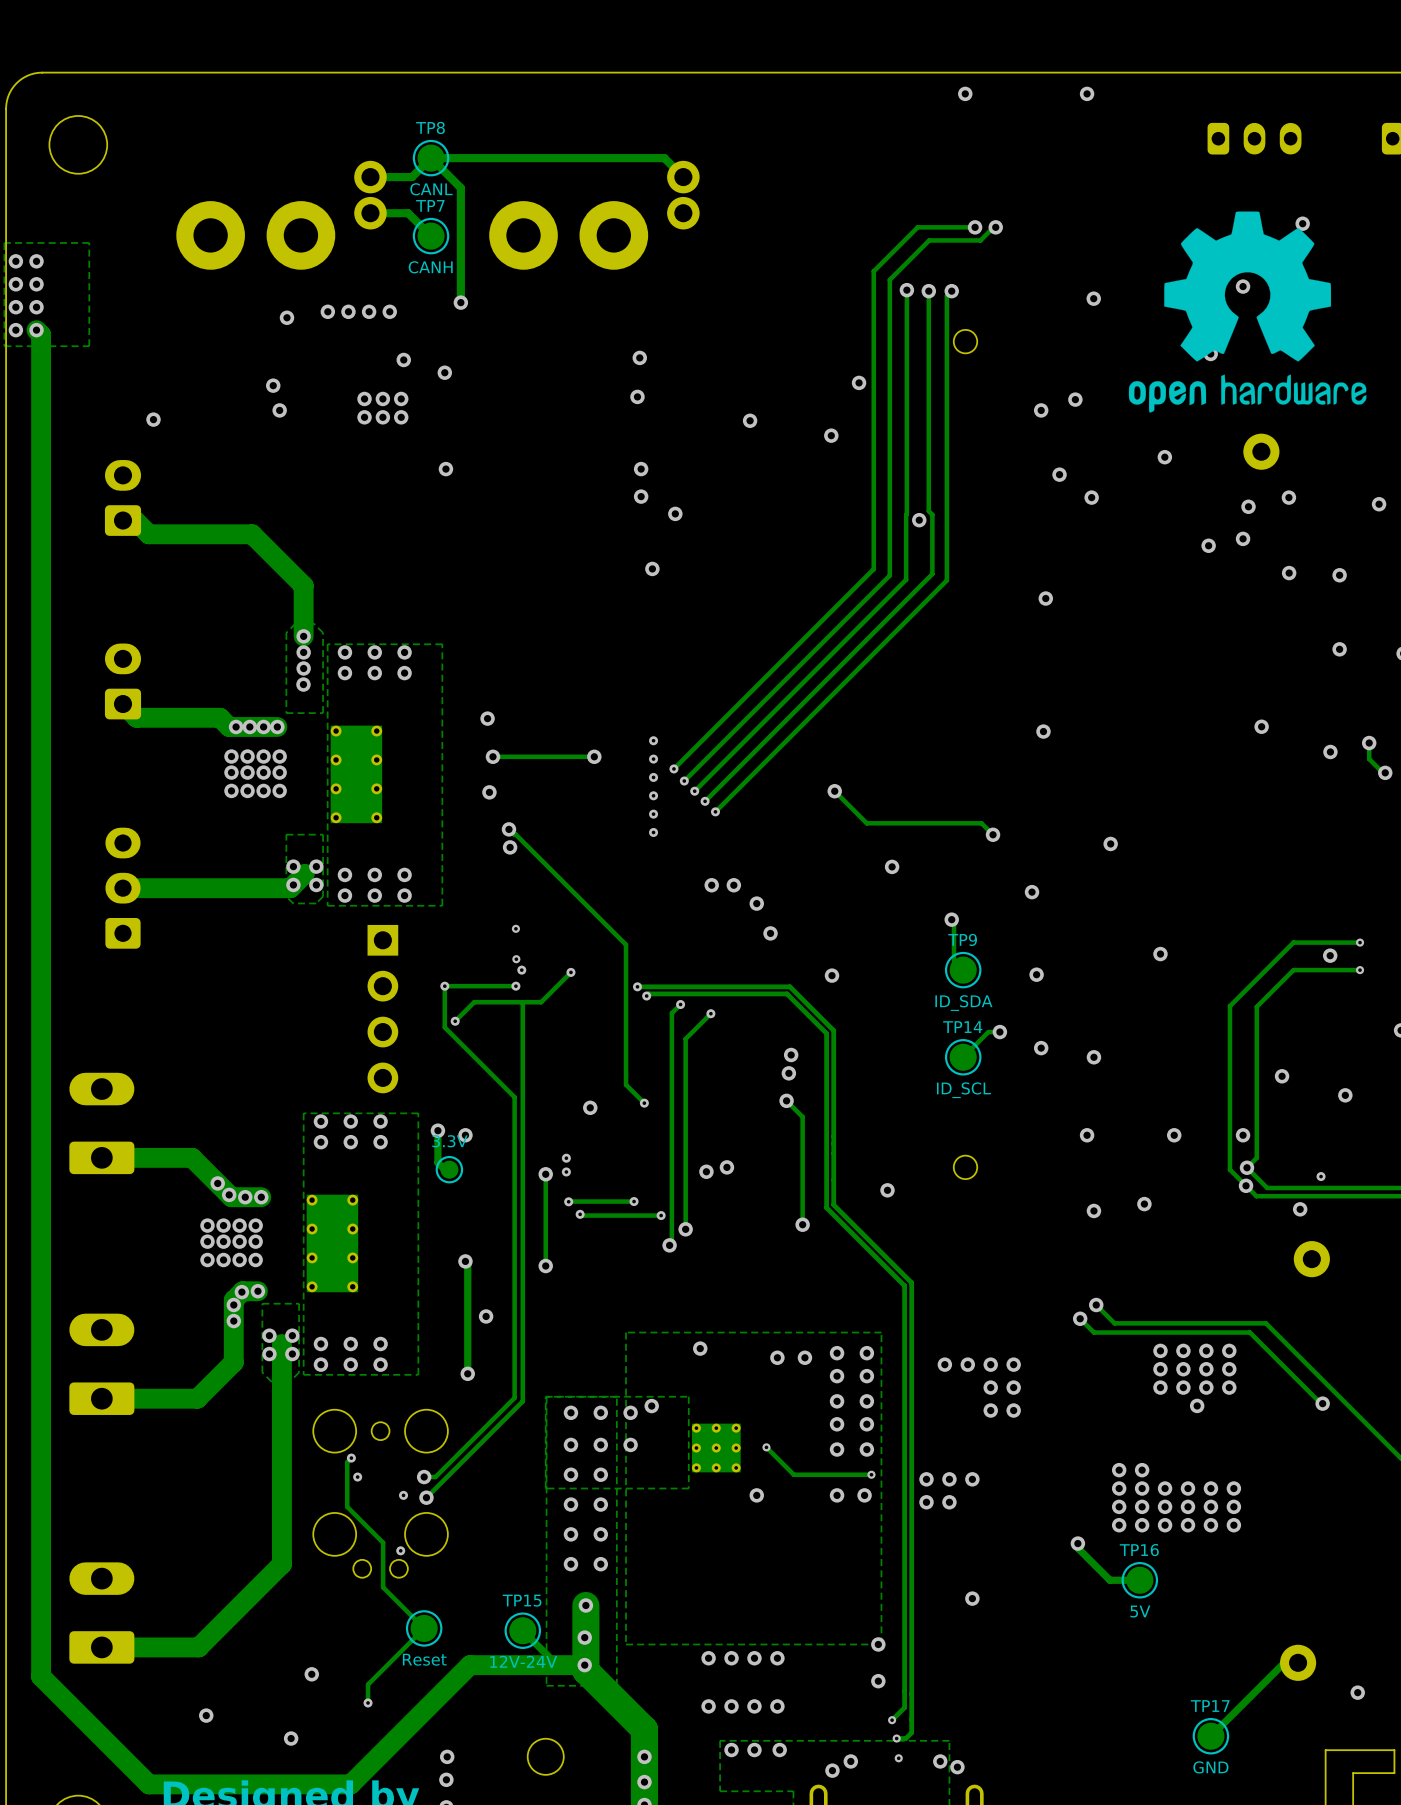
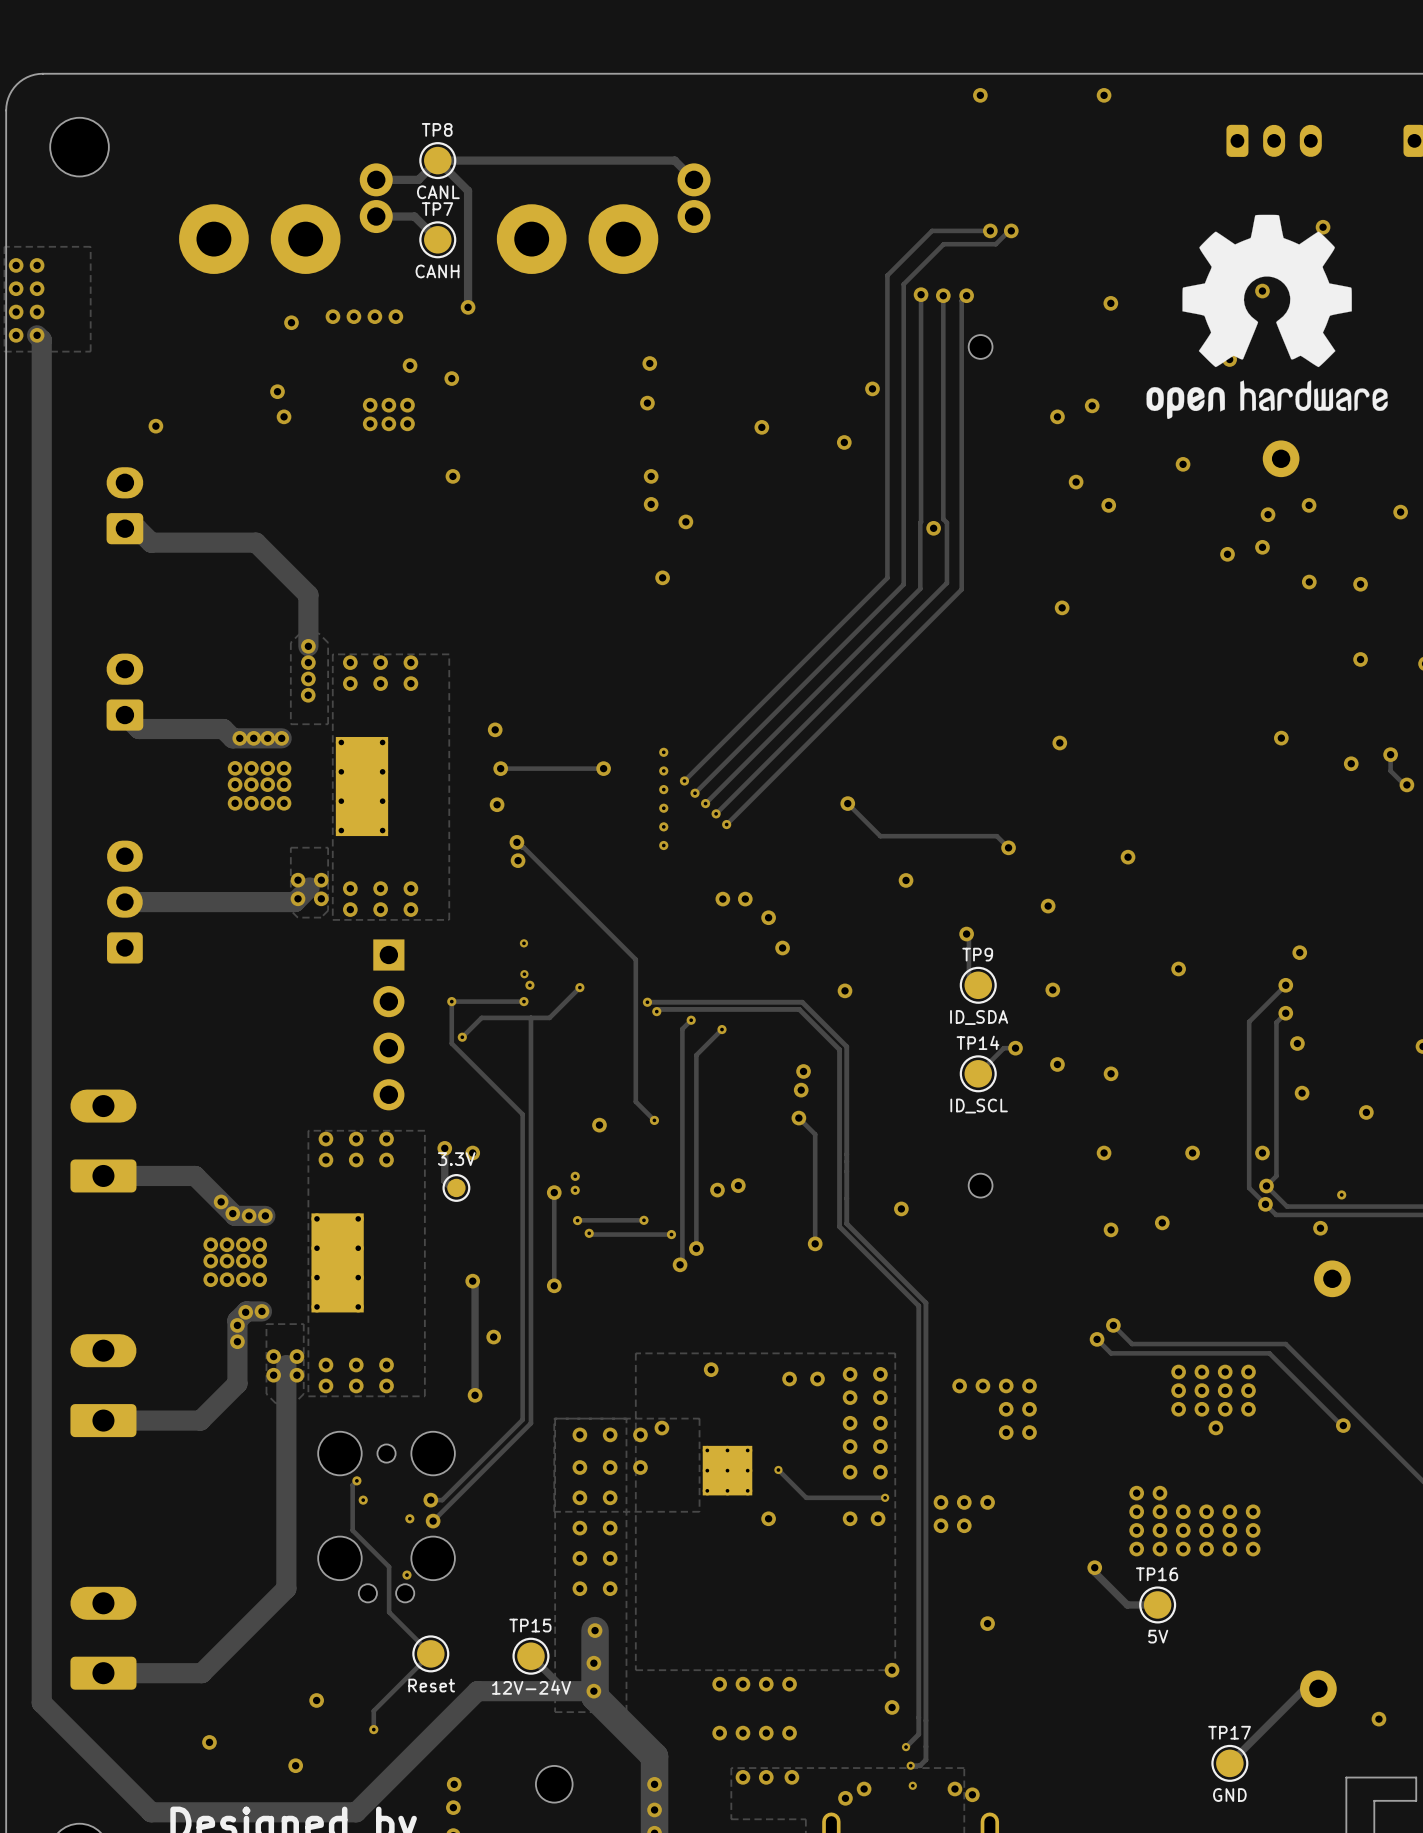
via: none -> (1299, 952)
track: (1360, 942) (1293, 942) (1265, 970) -> none
via: (1360, 942) -> none
via: (1330, 955) -> none
via: none -> (1285, 985)
track: (1360, 970) (1293, 970) (1265, 997) -> none
via: (1360, 970) -> none
via: none -> (1285, 1013)
via: none -> (1297, 1043)

